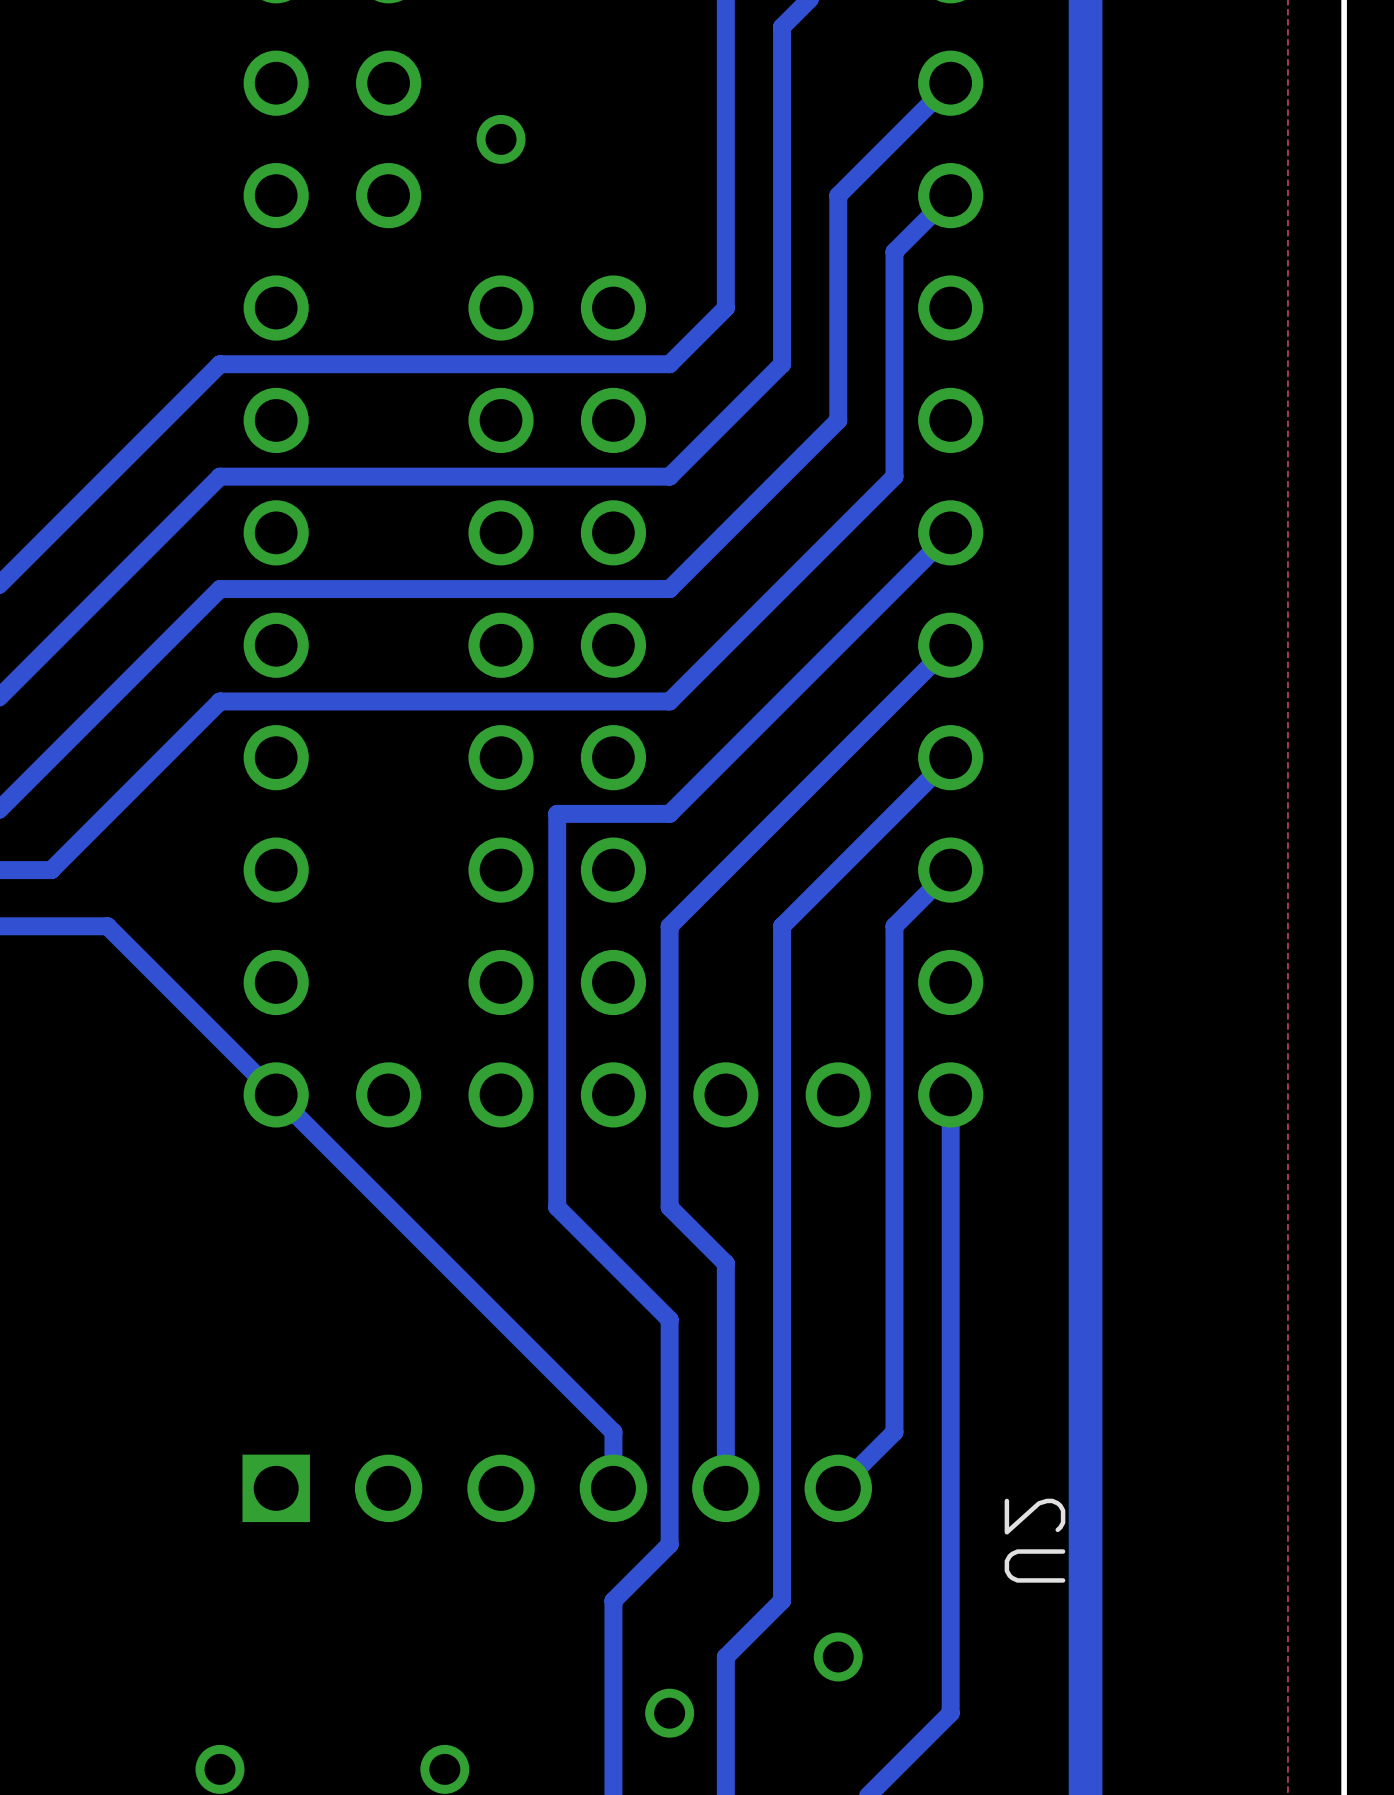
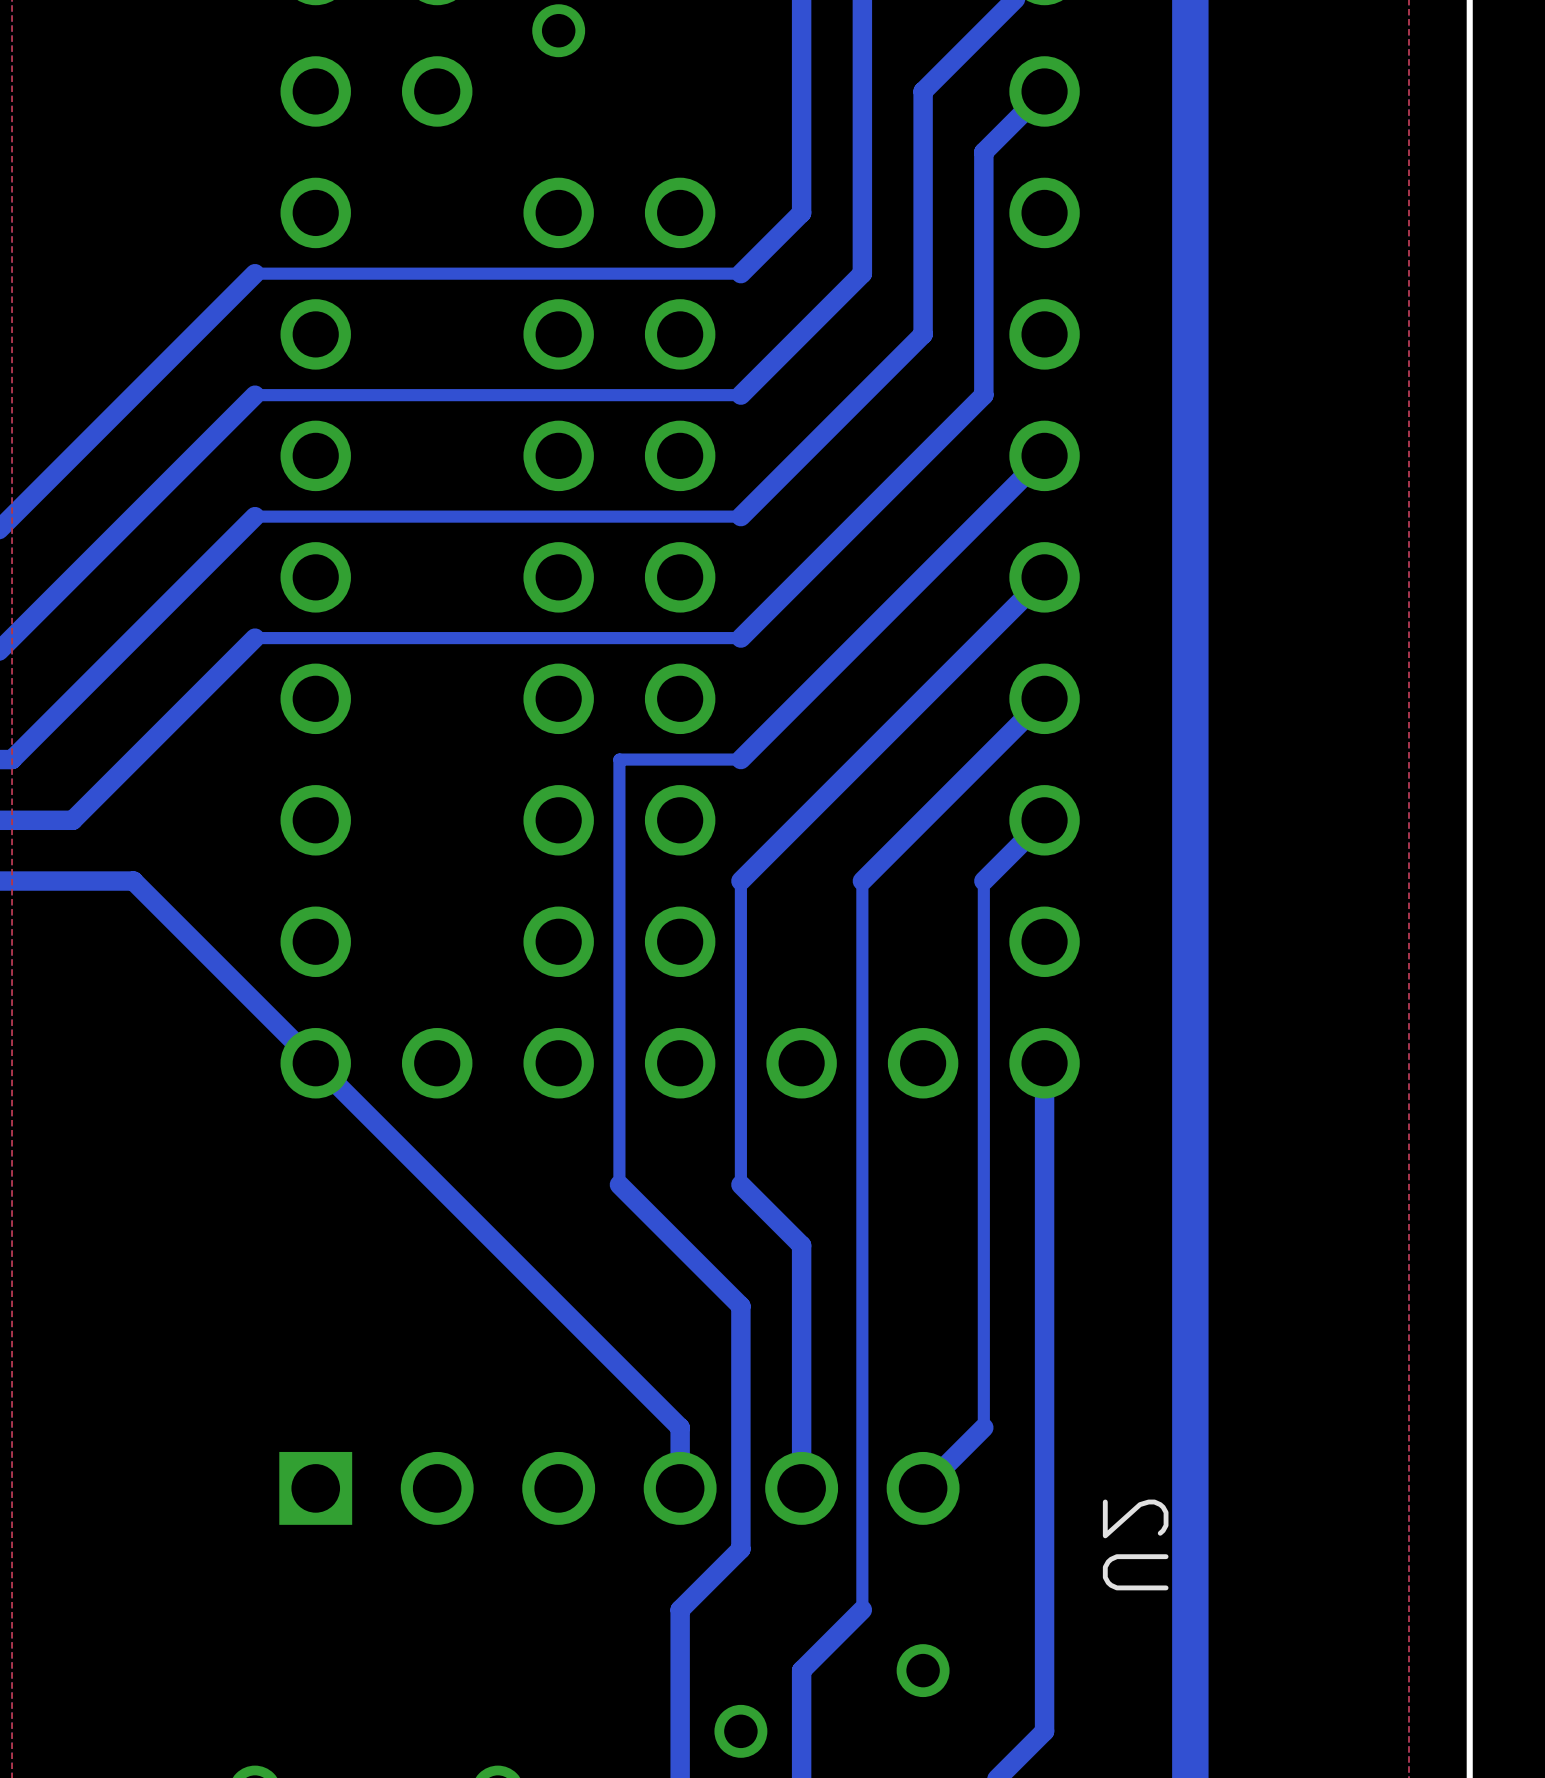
bottom track width: thick (219, 364) (669, 364) -> thin (255, 273) (740, 273)
bottom track width: thick (219, 476) (669, 476) -> thin (255, 395) (740, 395)
bottom track width: thick (219, 589) (669, 589) -> thin (255, 516) (740, 516)
bottom track width: thick (219, 701) (669, 701) -> thin (255, 638) (740, 638)
bottom track width: thick (669, 813) (557, 813) (557, 1207) -> thin (740, 759) (619, 759) (619, 1184)
bottom track width: thick (669, 926) (669, 1207) -> thin (740, 881) (740, 1184)
bottom track width: thick (782, 926) (782, 1600) -> thin (862, 881) (862, 1609)
bottom track width: thick (894, 926) (894, 1432) -> thin (983, 881) (983, 1427)

